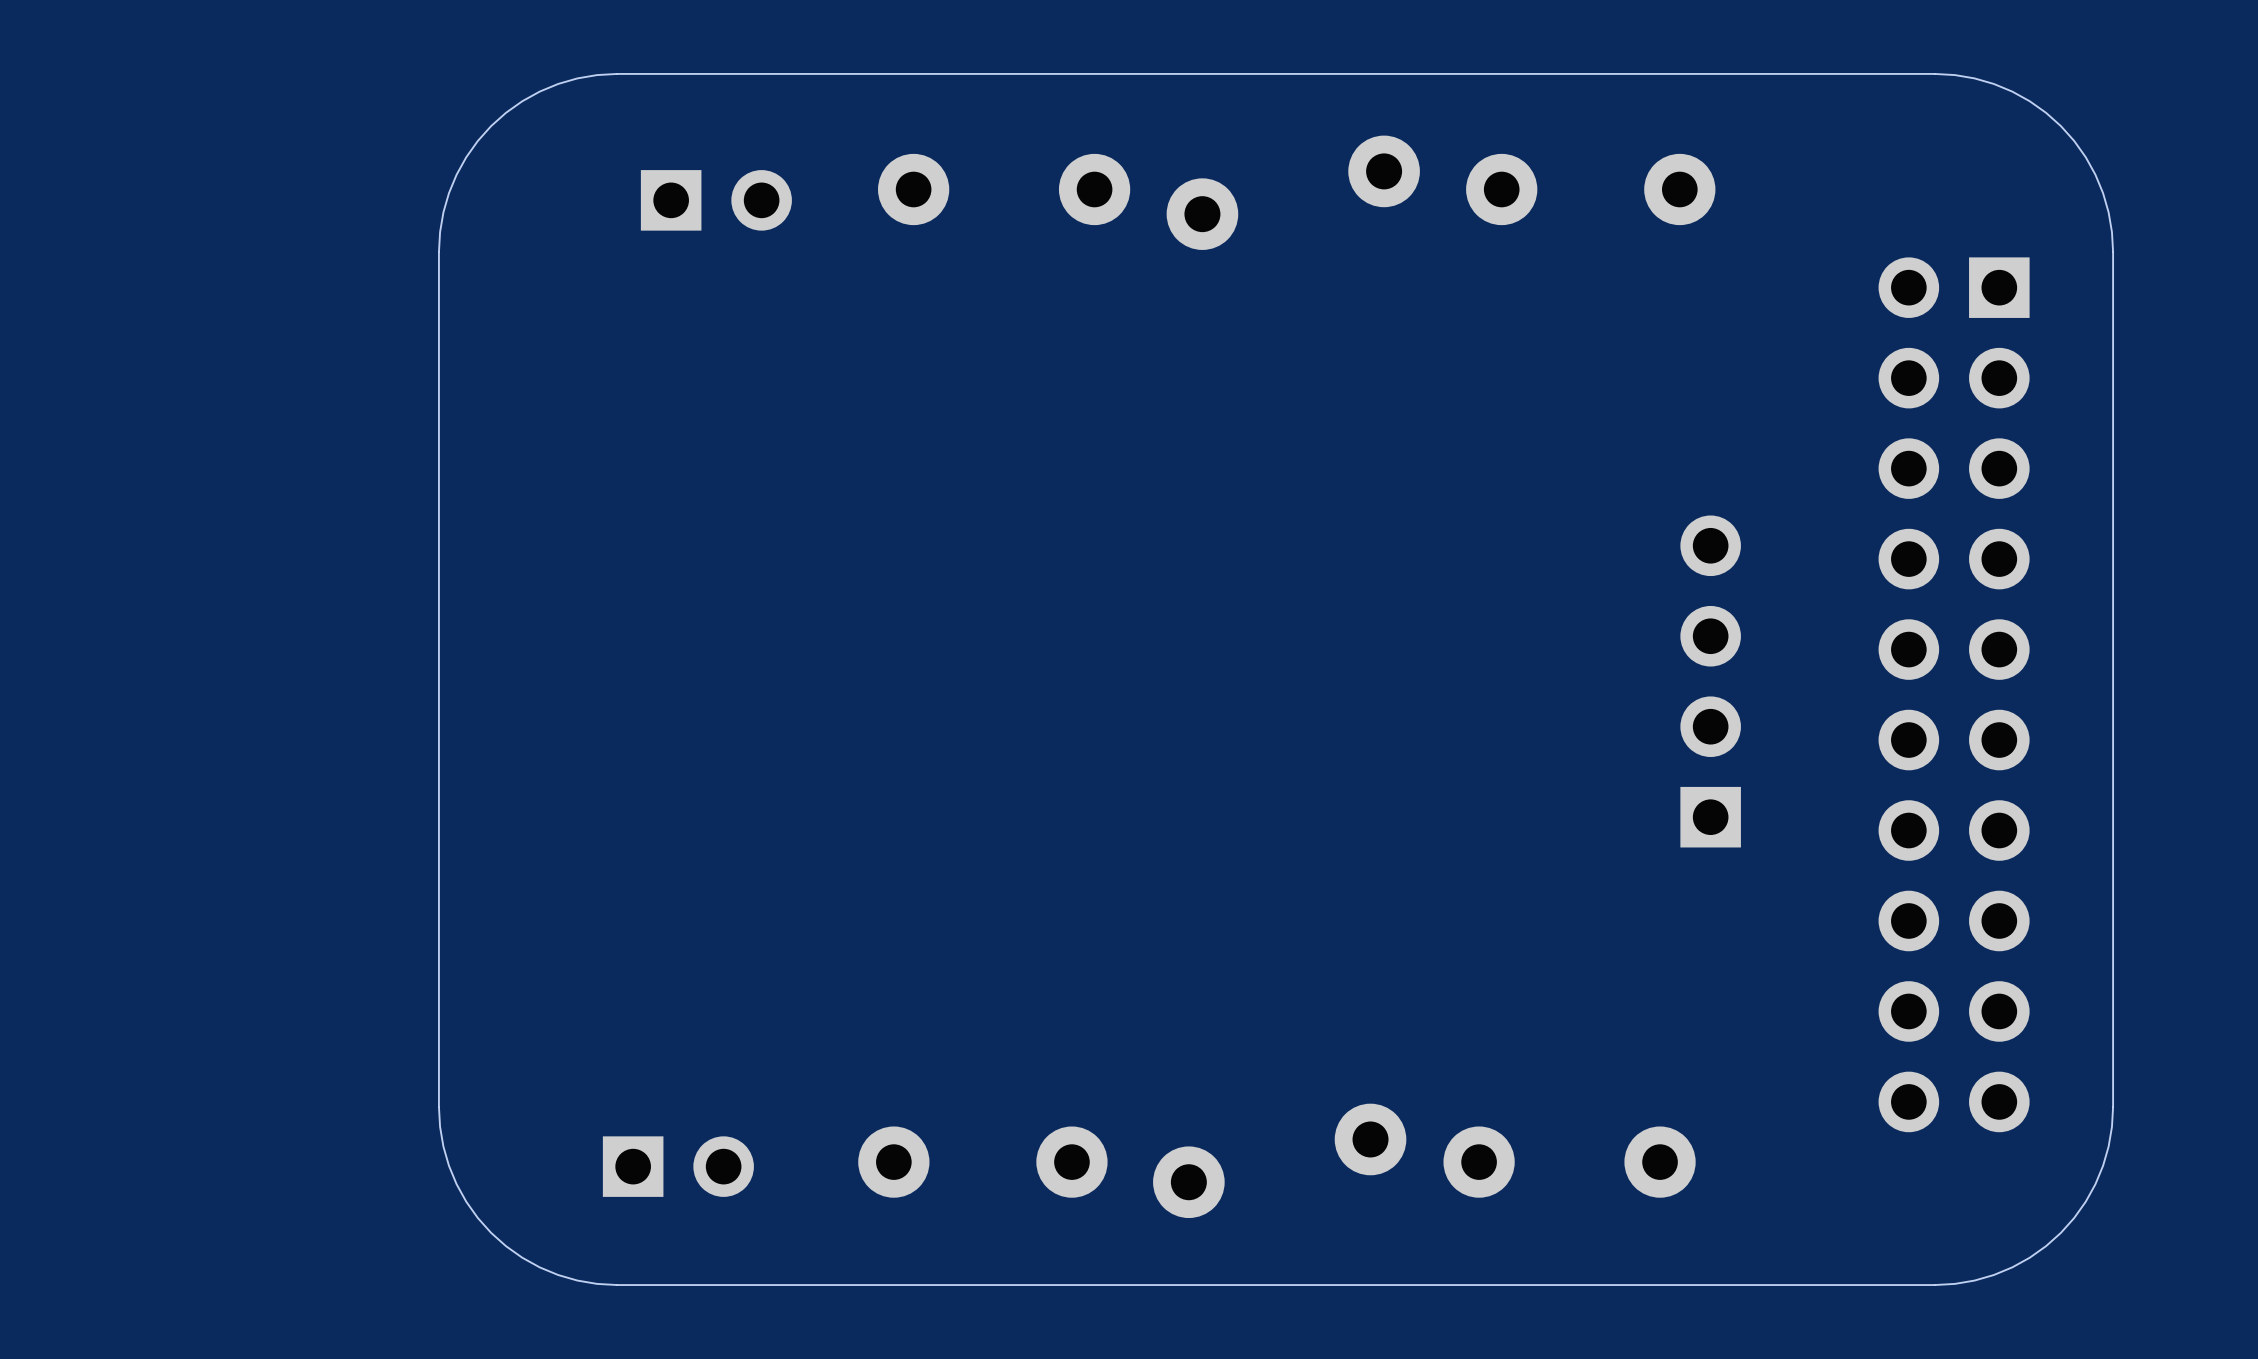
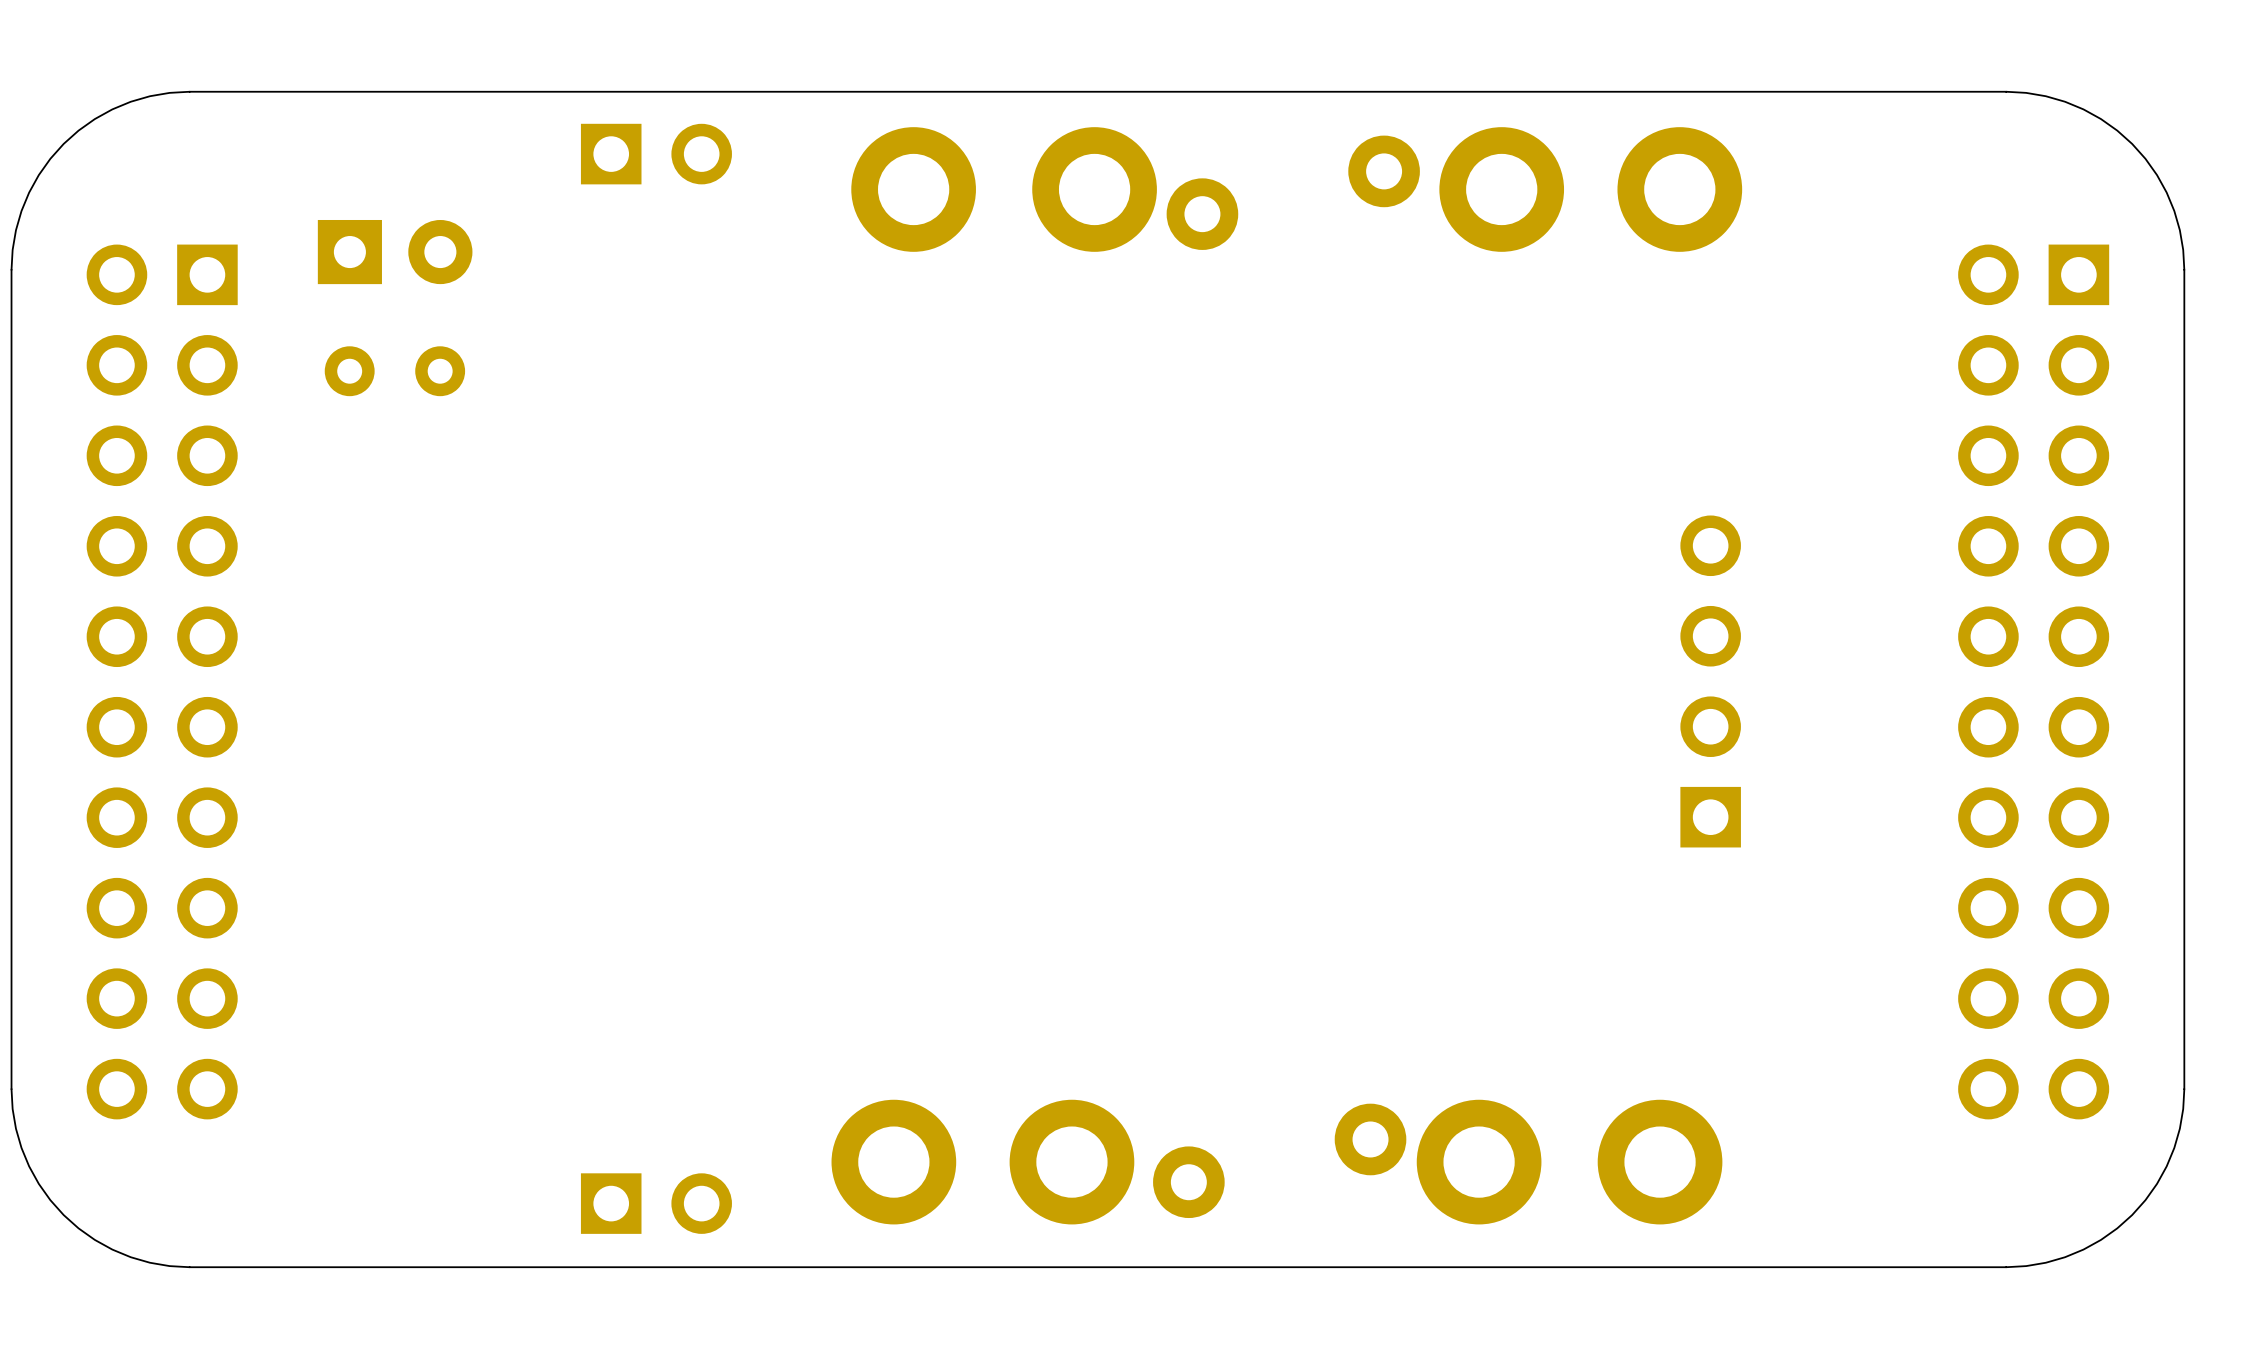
board edge: (1934, 73) (617, 73) (577, 78) (558, 83) (522, 101) (506, 112) (477, 141) (456, 174) (443, 212) (438, 252) (438, 1106) (440, 1126) (448, 1165) (466, 1201) (477, 1217) (506, 1246) (539, 1267) (577, 1280) (617, 1285) (1934, 1285) (1954, 1283) (1993, 1275) (2029, 1257) (2046, 1246) (2060, 1232) (2085, 1201) (2103, 1165) (2111, 1126) (2111, 232) (2103, 193) (2095, 174) (2085, 157) (2060, 126) (2046, 112) (2012, 91) (1974, 78) (1934, 73) -> (2006, 91) (2045, 96) (2083, 109) (2117, 130) (2132, 143) (2157, 175) (2166, 192) (2174, 211) (2183, 249) (2183, 1109) (2174, 1147) (2157, 1183) (2132, 1215) (2100, 1239) (2083, 1249) (2045, 1262) (2006, 1267) (189, 1267) (149, 1262) (130, 1257) (94, 1239) (63, 1215) (38, 1183) (29, 1166) (15, 1128) (11, 1089) (12, 249) (21, 211) (38, 175) (63, 143) (94, 119) (112, 109) (149, 96) (189, 91) (2006, 91)
part footprint: [878, 153, 950, 226] -> [851, 127, 976, 252]
part footprint: [1058, 153, 1131, 226] -> [1032, 127, 1157, 252]
part footprint: [1466, 153, 1538, 226] -> [1439, 127, 1565, 252]
part footprint: [1644, 153, 1716, 226] -> [1617, 127, 1743, 252]
part position: (716, 200) -> (656, 154)
part: none -> (395, 252)
part: none -> (394, 371)
part: none -> (162, 681)
part position: (1954, 694) -> (2033, 681)
part footprint: [858, 1126, 930, 1198] -> [831, 1099, 957, 1225]
part footprint: [1036, 1126, 1108, 1198] -> [1009, 1099, 1135, 1225]
part footprint: [1443, 1126, 1515, 1198] -> [1416, 1099, 1542, 1225]
part footprint: [1624, 1126, 1696, 1198] -> [1597, 1099, 1723, 1225]
part position: (678, 1166) -> (656, 1203)

